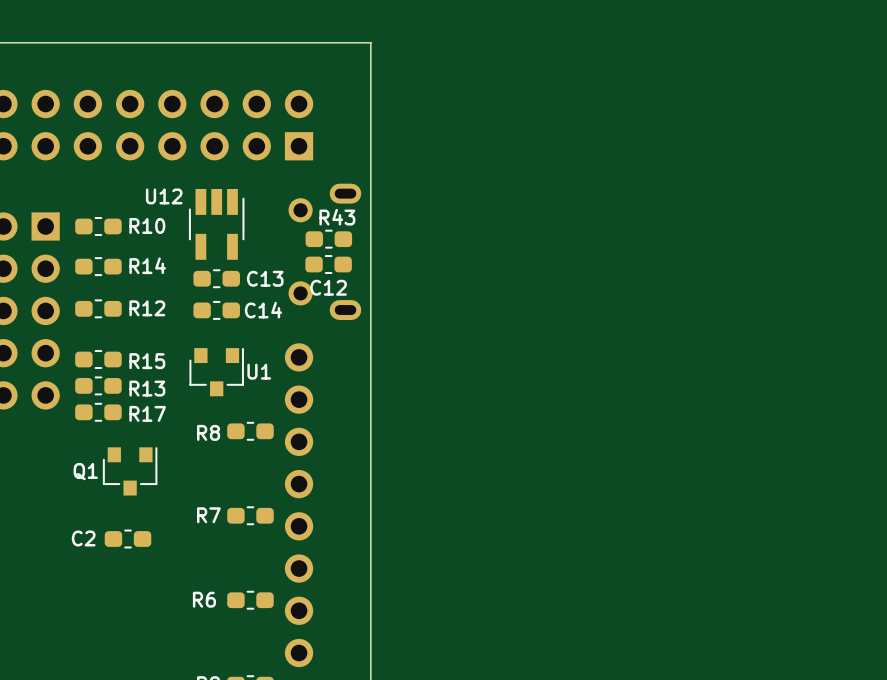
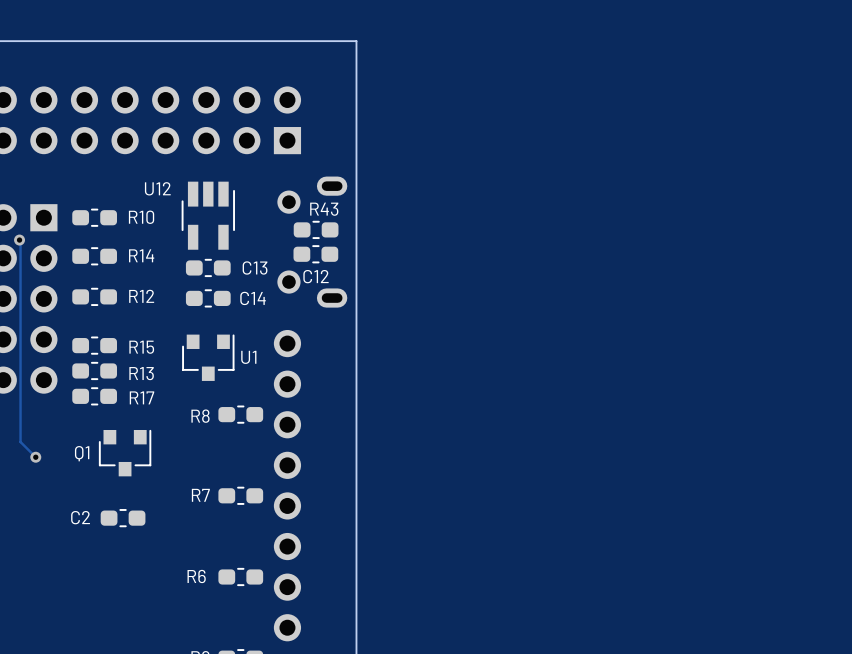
track: none -> (19, 240) (20, 442) (35, 457)
via: none -> (19, 240)
via: none -> (35, 457)

